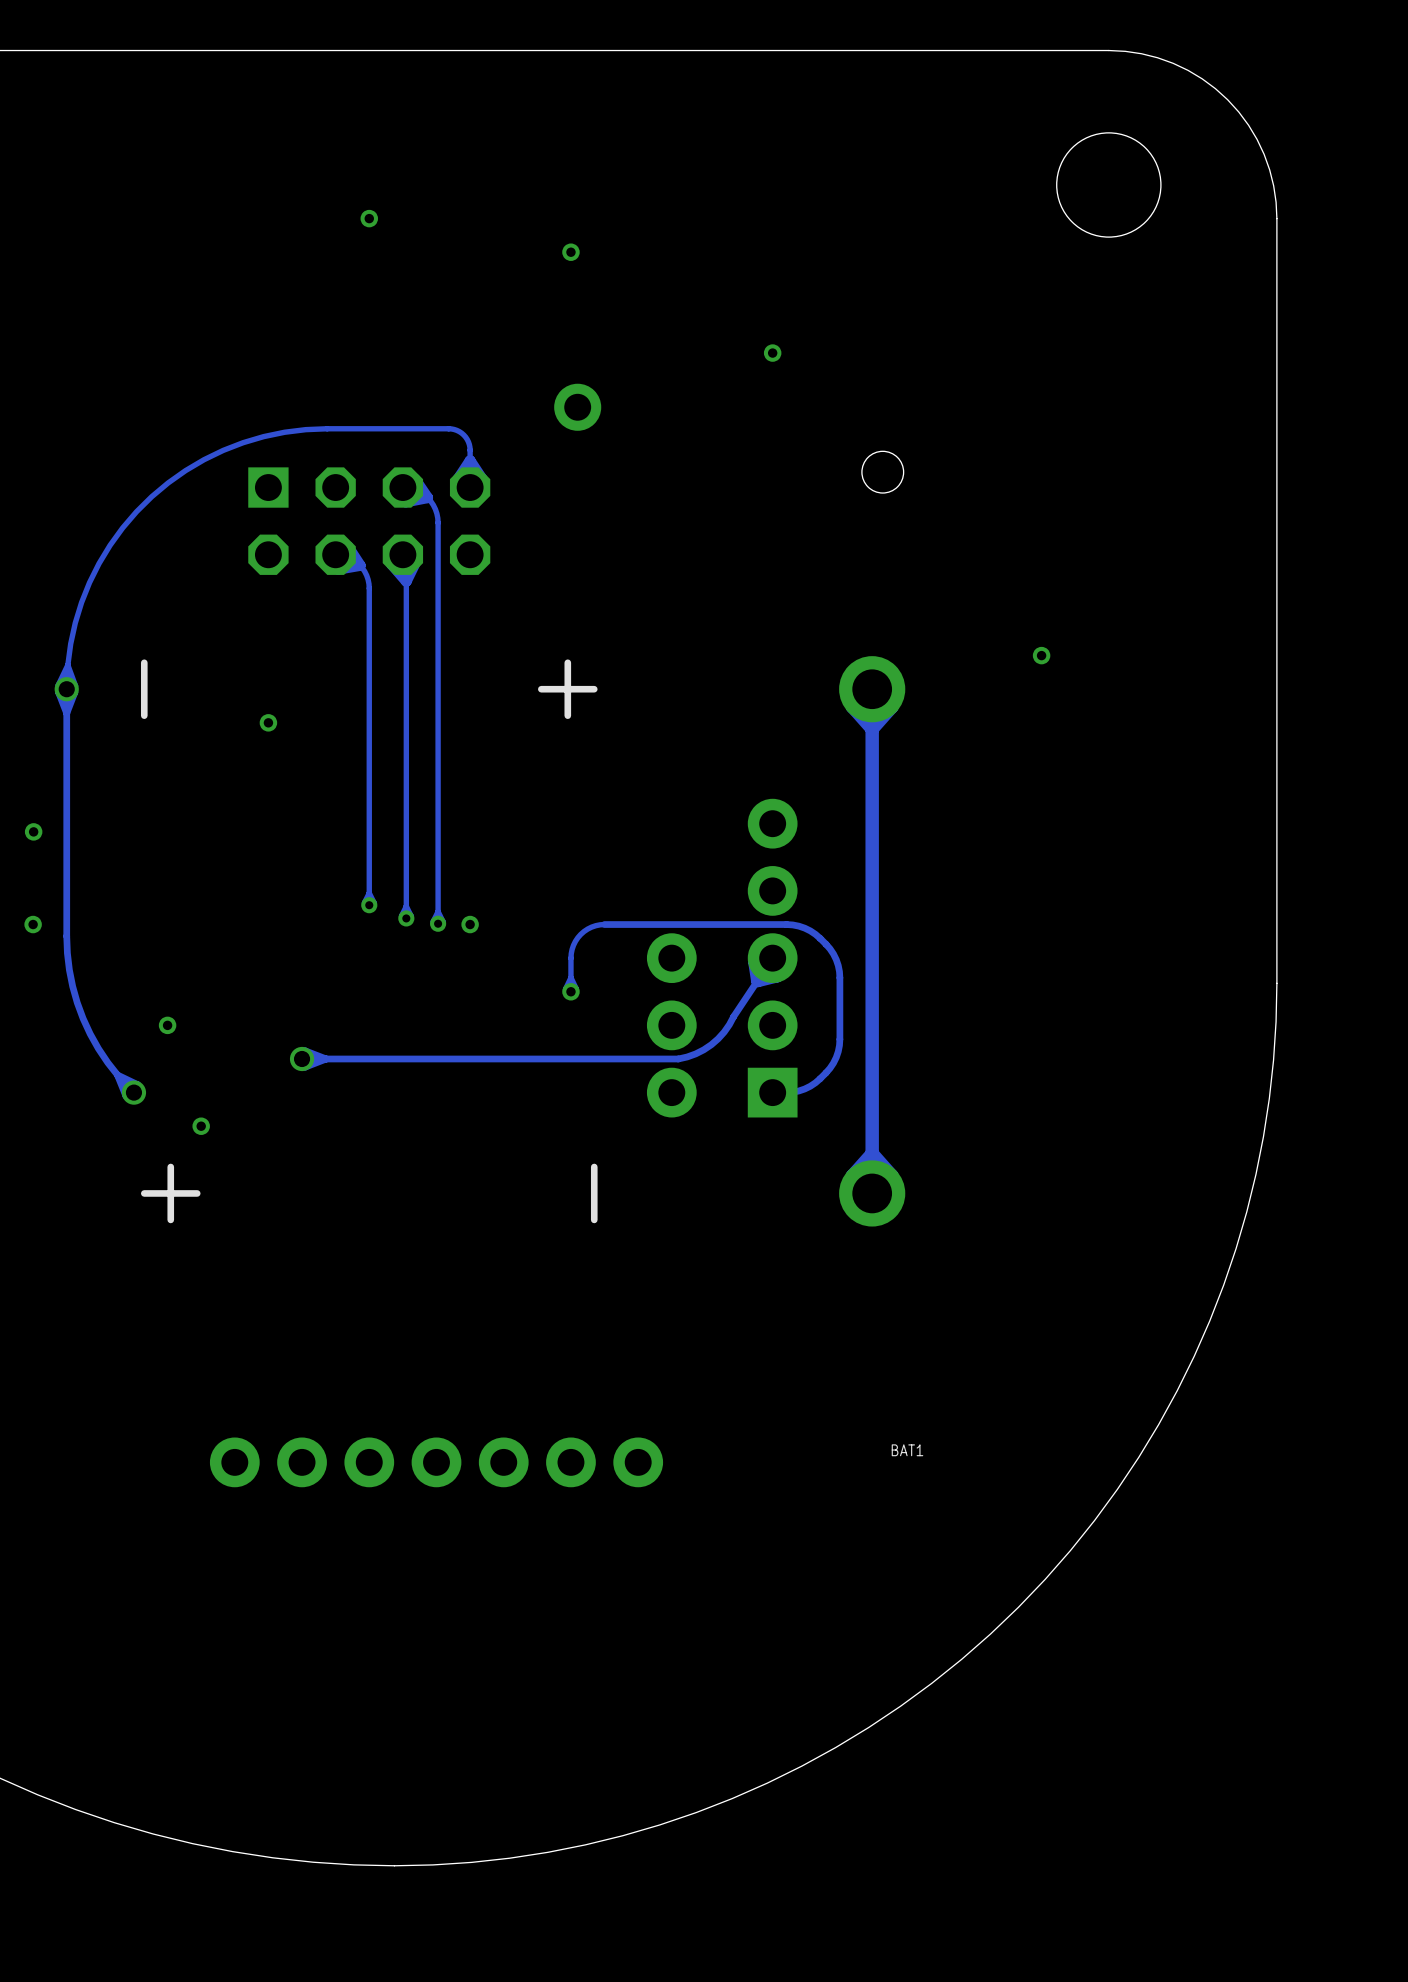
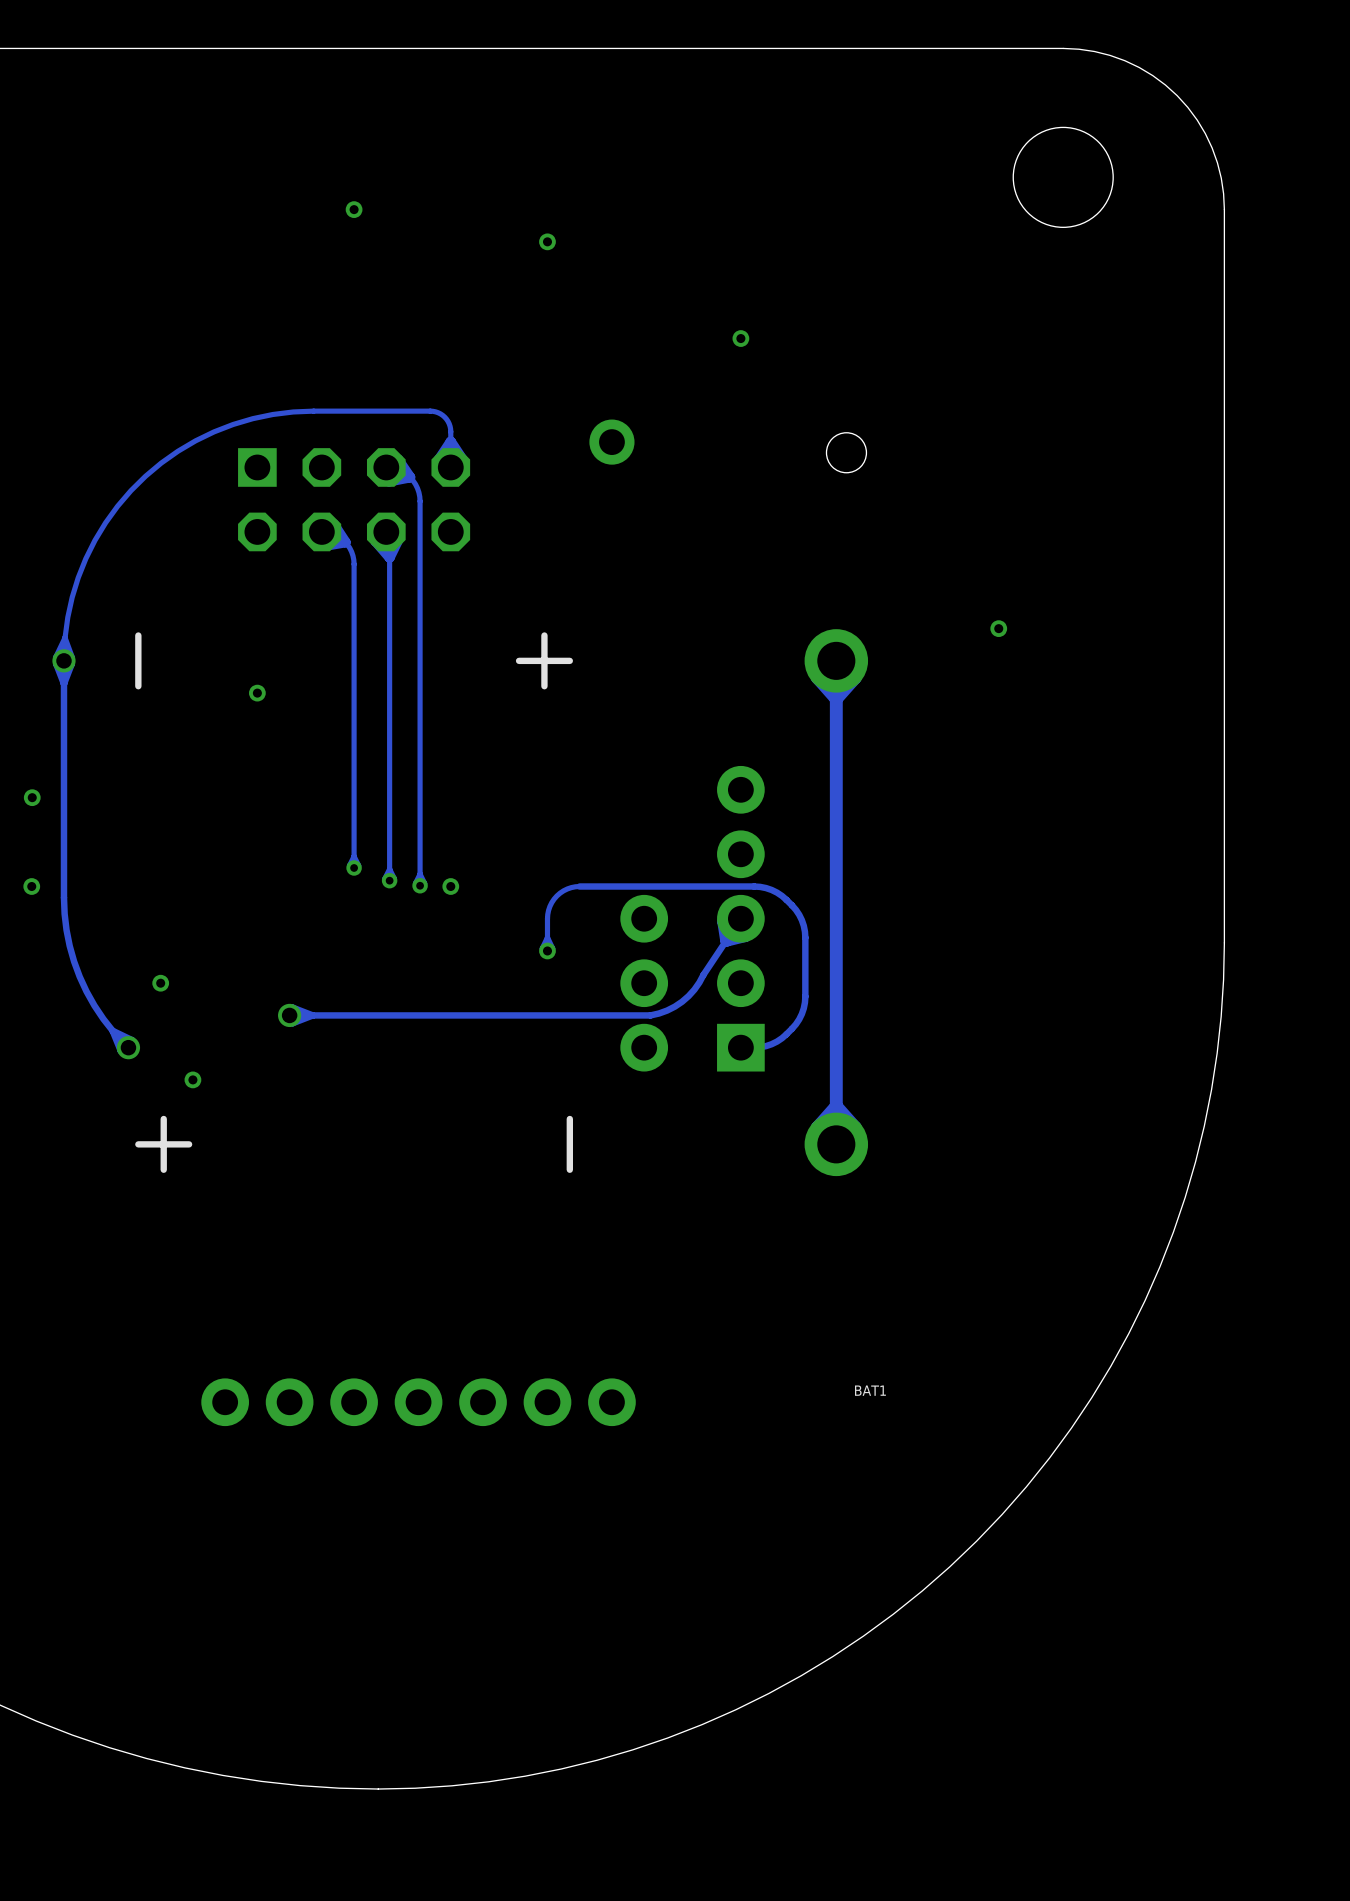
via position: (577, 407) -> (611, 442)

